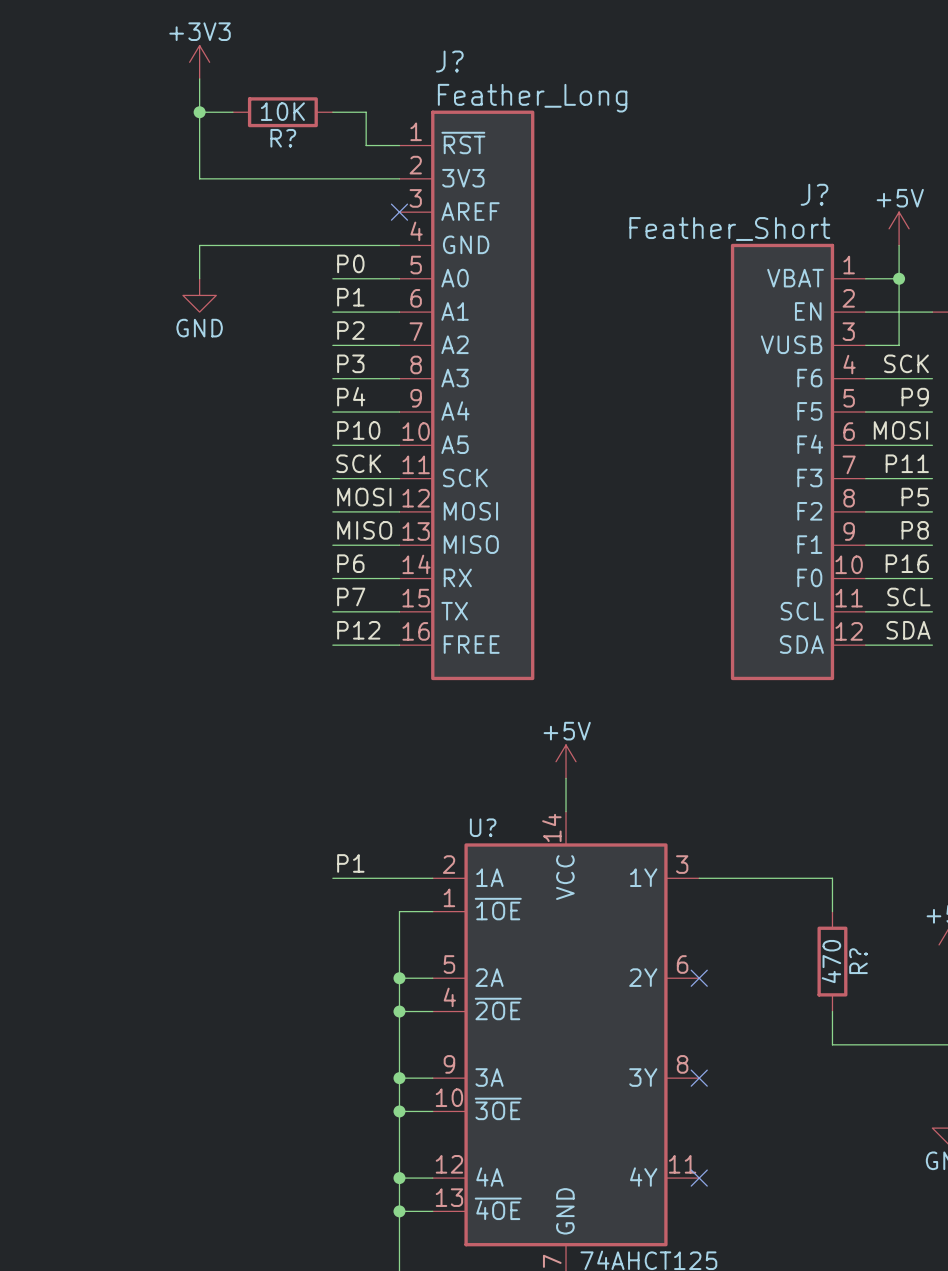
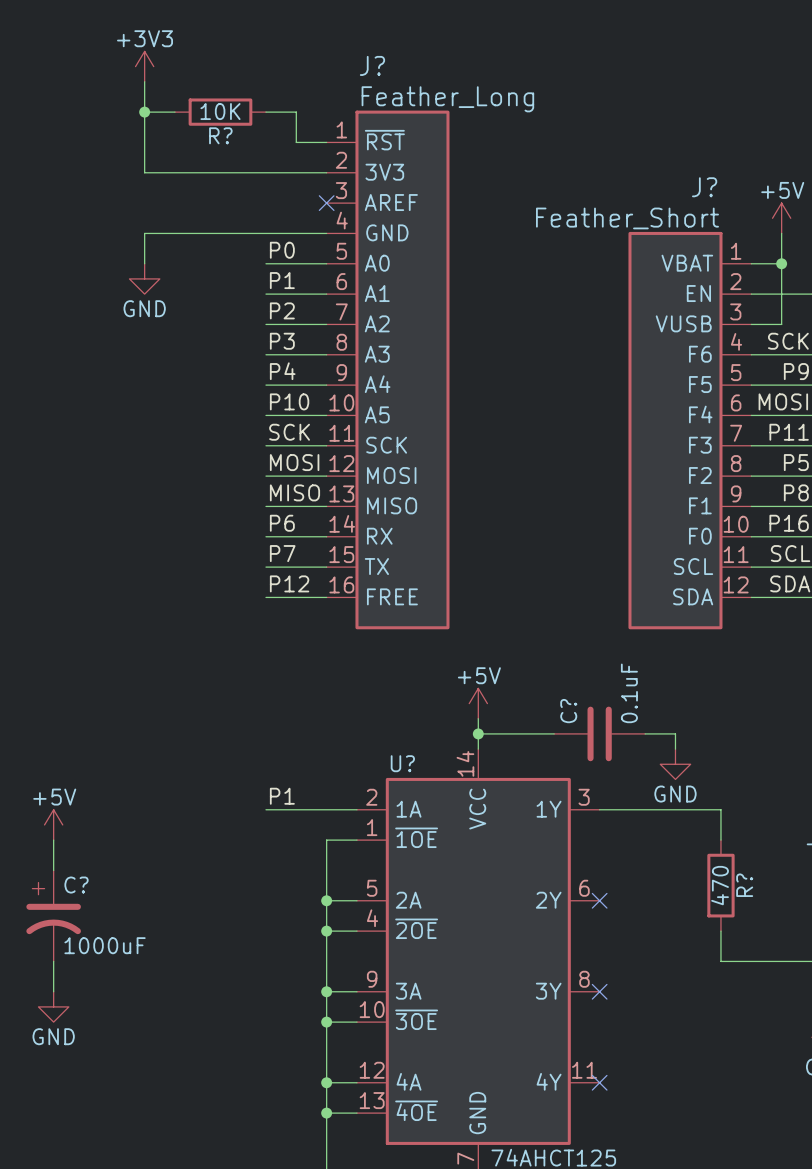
wire: none -> (478, 733) (554, 733)
junction: none -> (478, 733)
C?: none -> 0.1uF (599, 733)
wire: none -> (645, 733) (675, 733) (675, 749)
power symbol: none -> GND (675, 764)
power symbol: none -> +5V (53, 824)
wire: none -> (53, 840) (53, 870)
C?: none -> 1000uF (53, 915)
wire: none -> (53, 961) (53, 991)
power symbol: none -> GND (53, 1006)

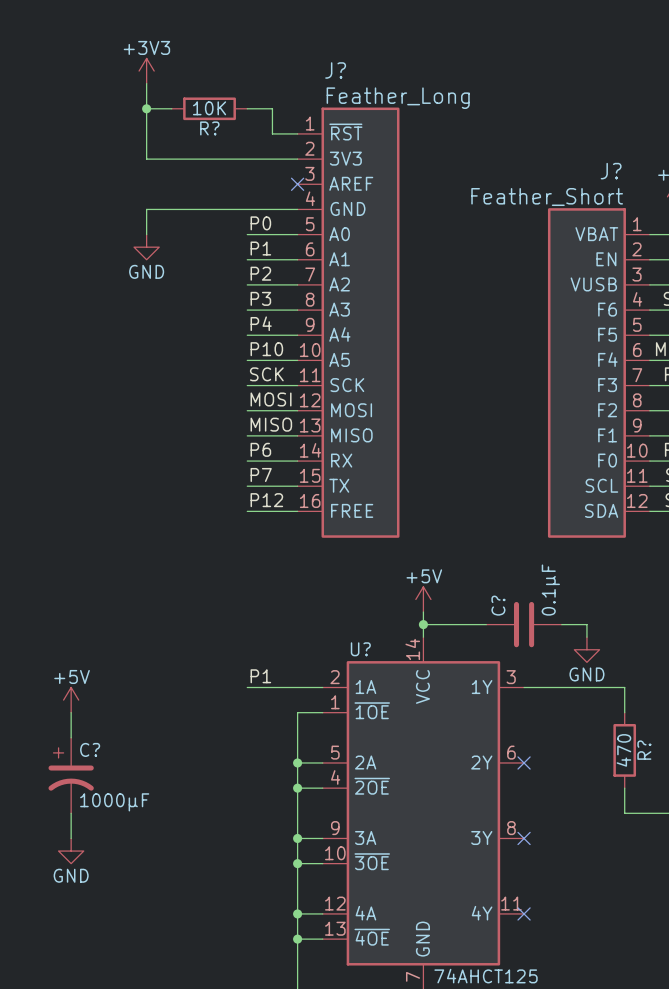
C? value: 0.1uF (629, 693) -> 0.1µF (550, 590)
C? value: 1000uF (105, 945) -> 1000µF (114, 802)

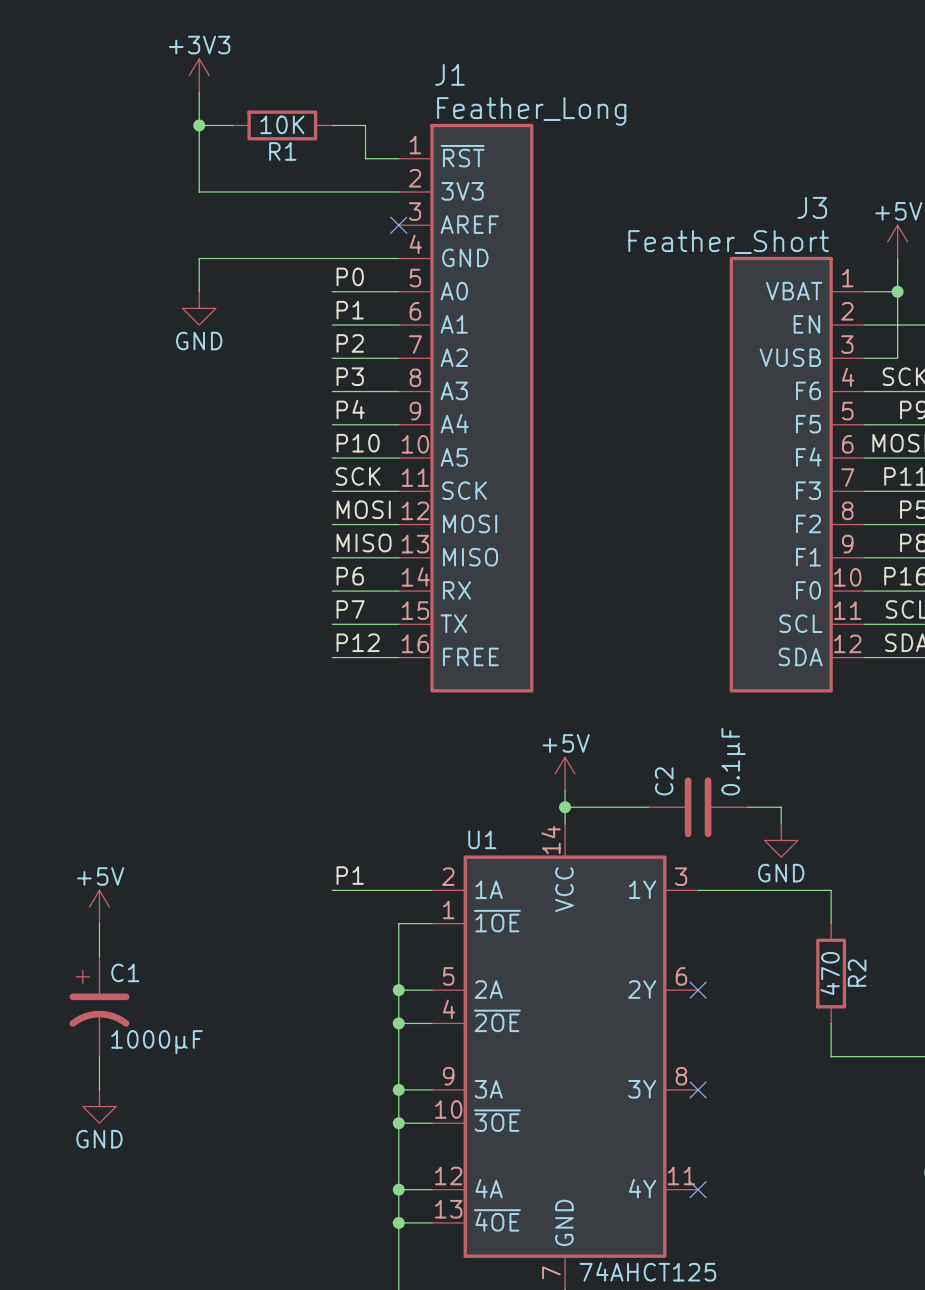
J? name: J? (335, 70) -> J1 (449, 74)
R? name: R? (209, 128) -> R1 (282, 151)
J? name: J? (611, 171) -> J3 (812, 207)
C? name: C? (498, 605) -> C2 (664, 781)
U? name: U? (360, 649) -> U1 (482, 839)
C? name: C? (90, 749) -> C1 (125, 972)
R? name: R? (644, 750) -> R2 (857, 973)

